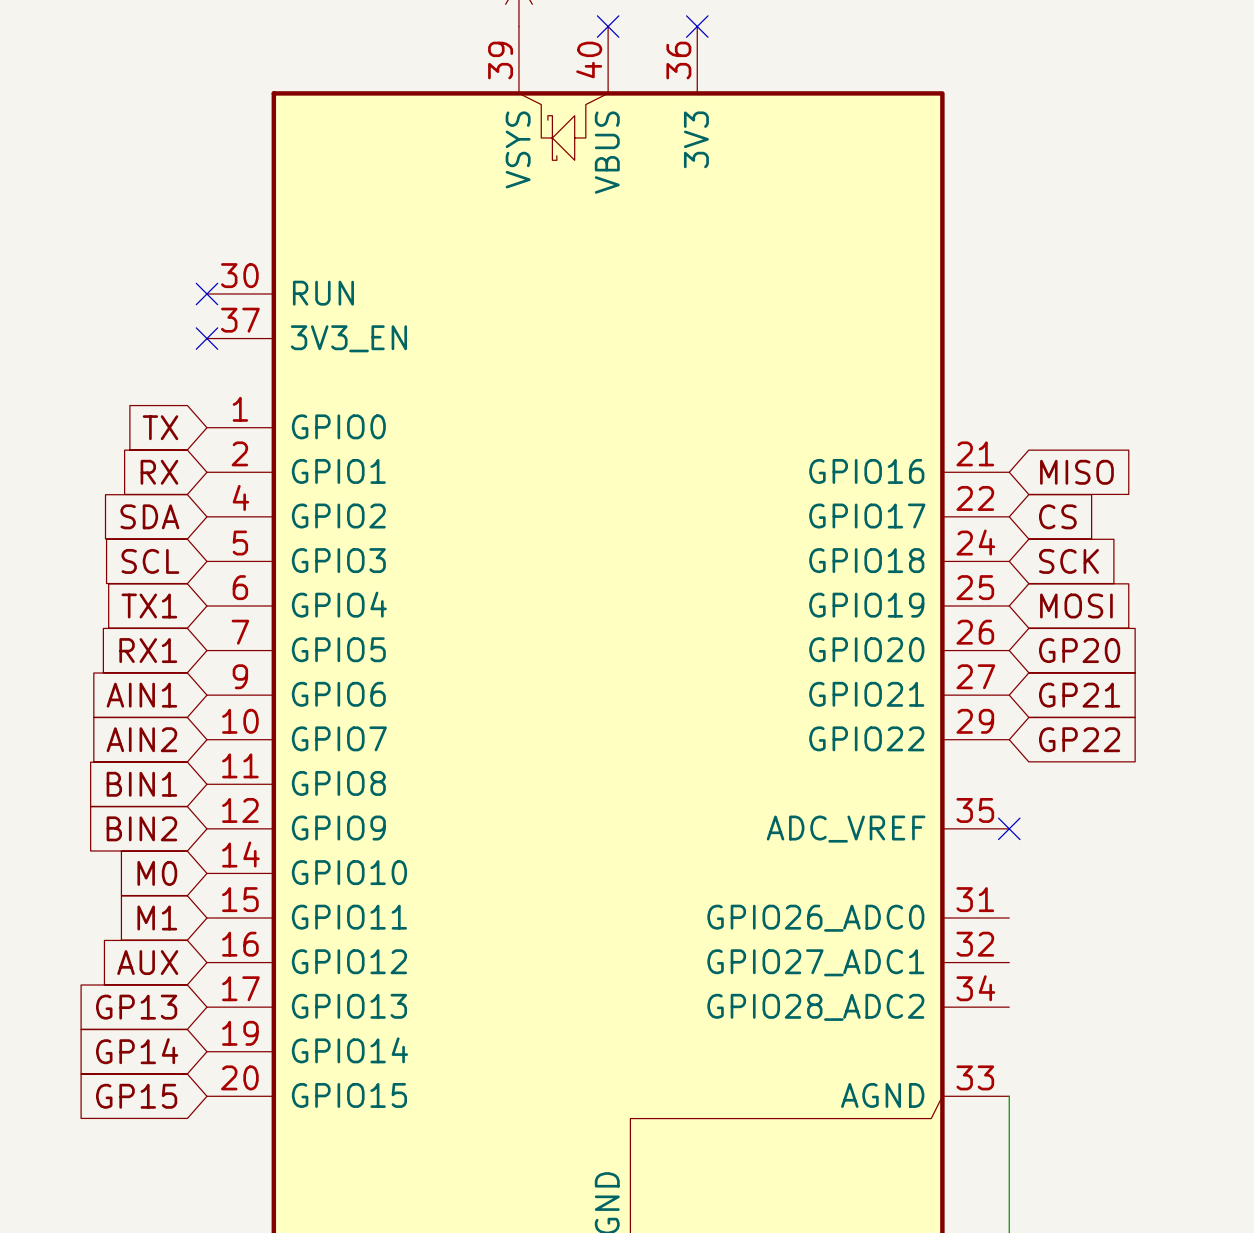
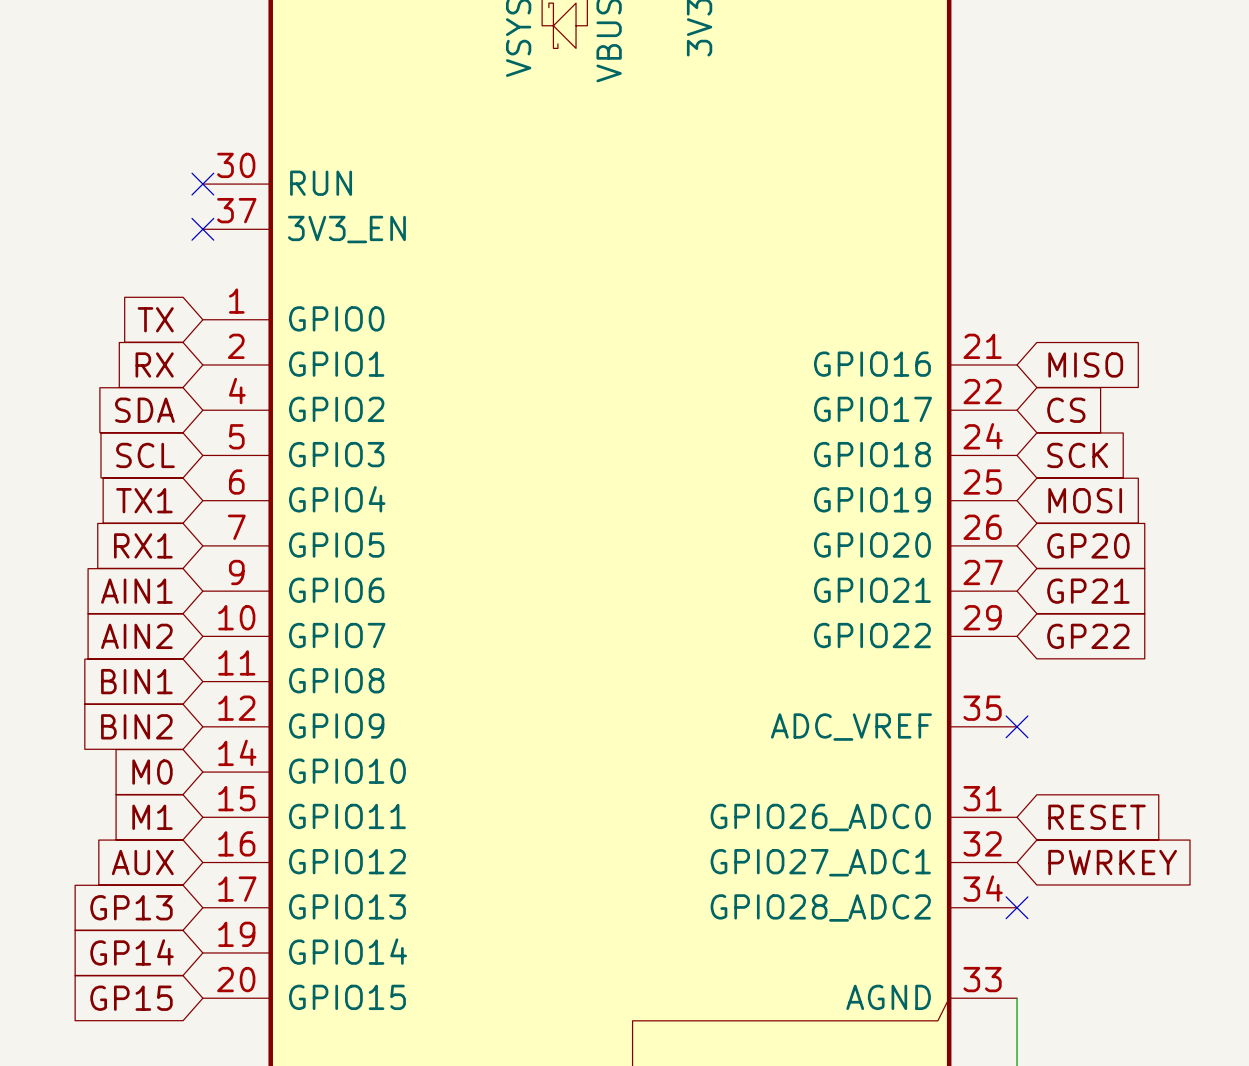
global label: none -> RESET (1097, 817)
global label: none -> PWRKEY (1112, 862)
no-connect mark: none -> (1017, 907)

